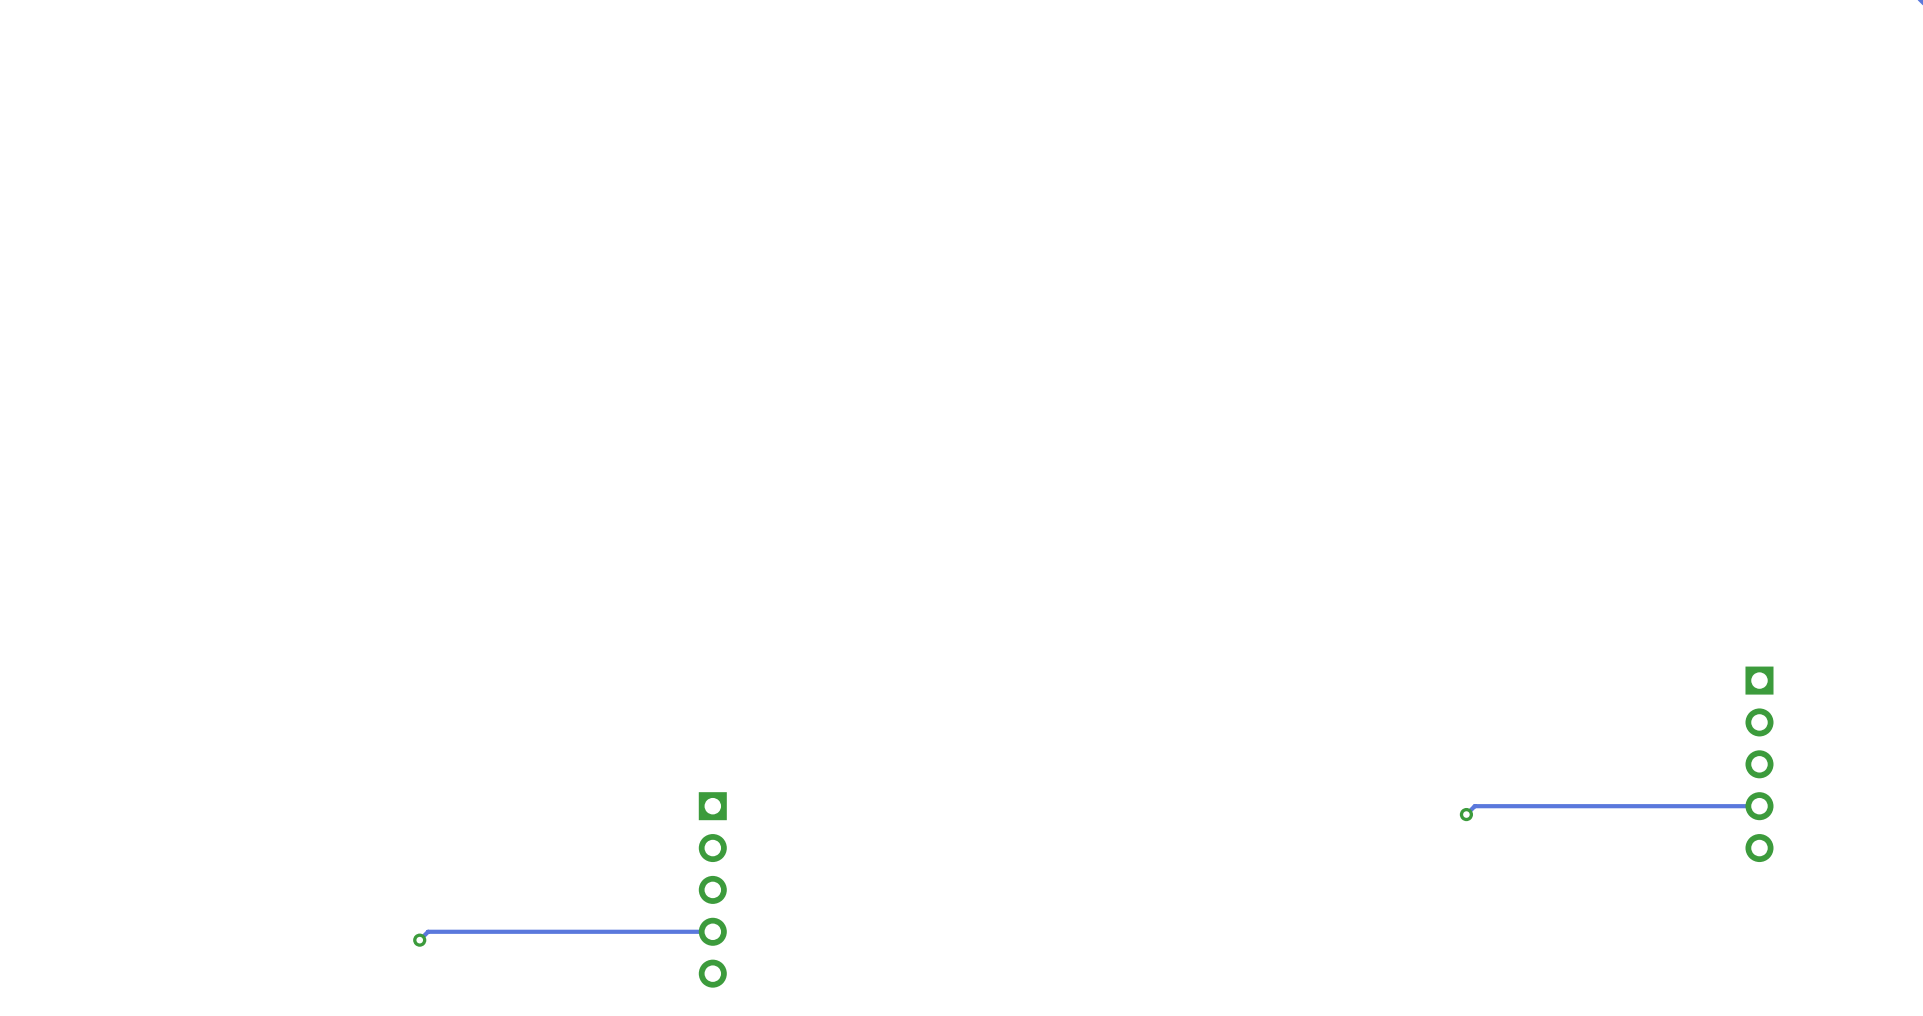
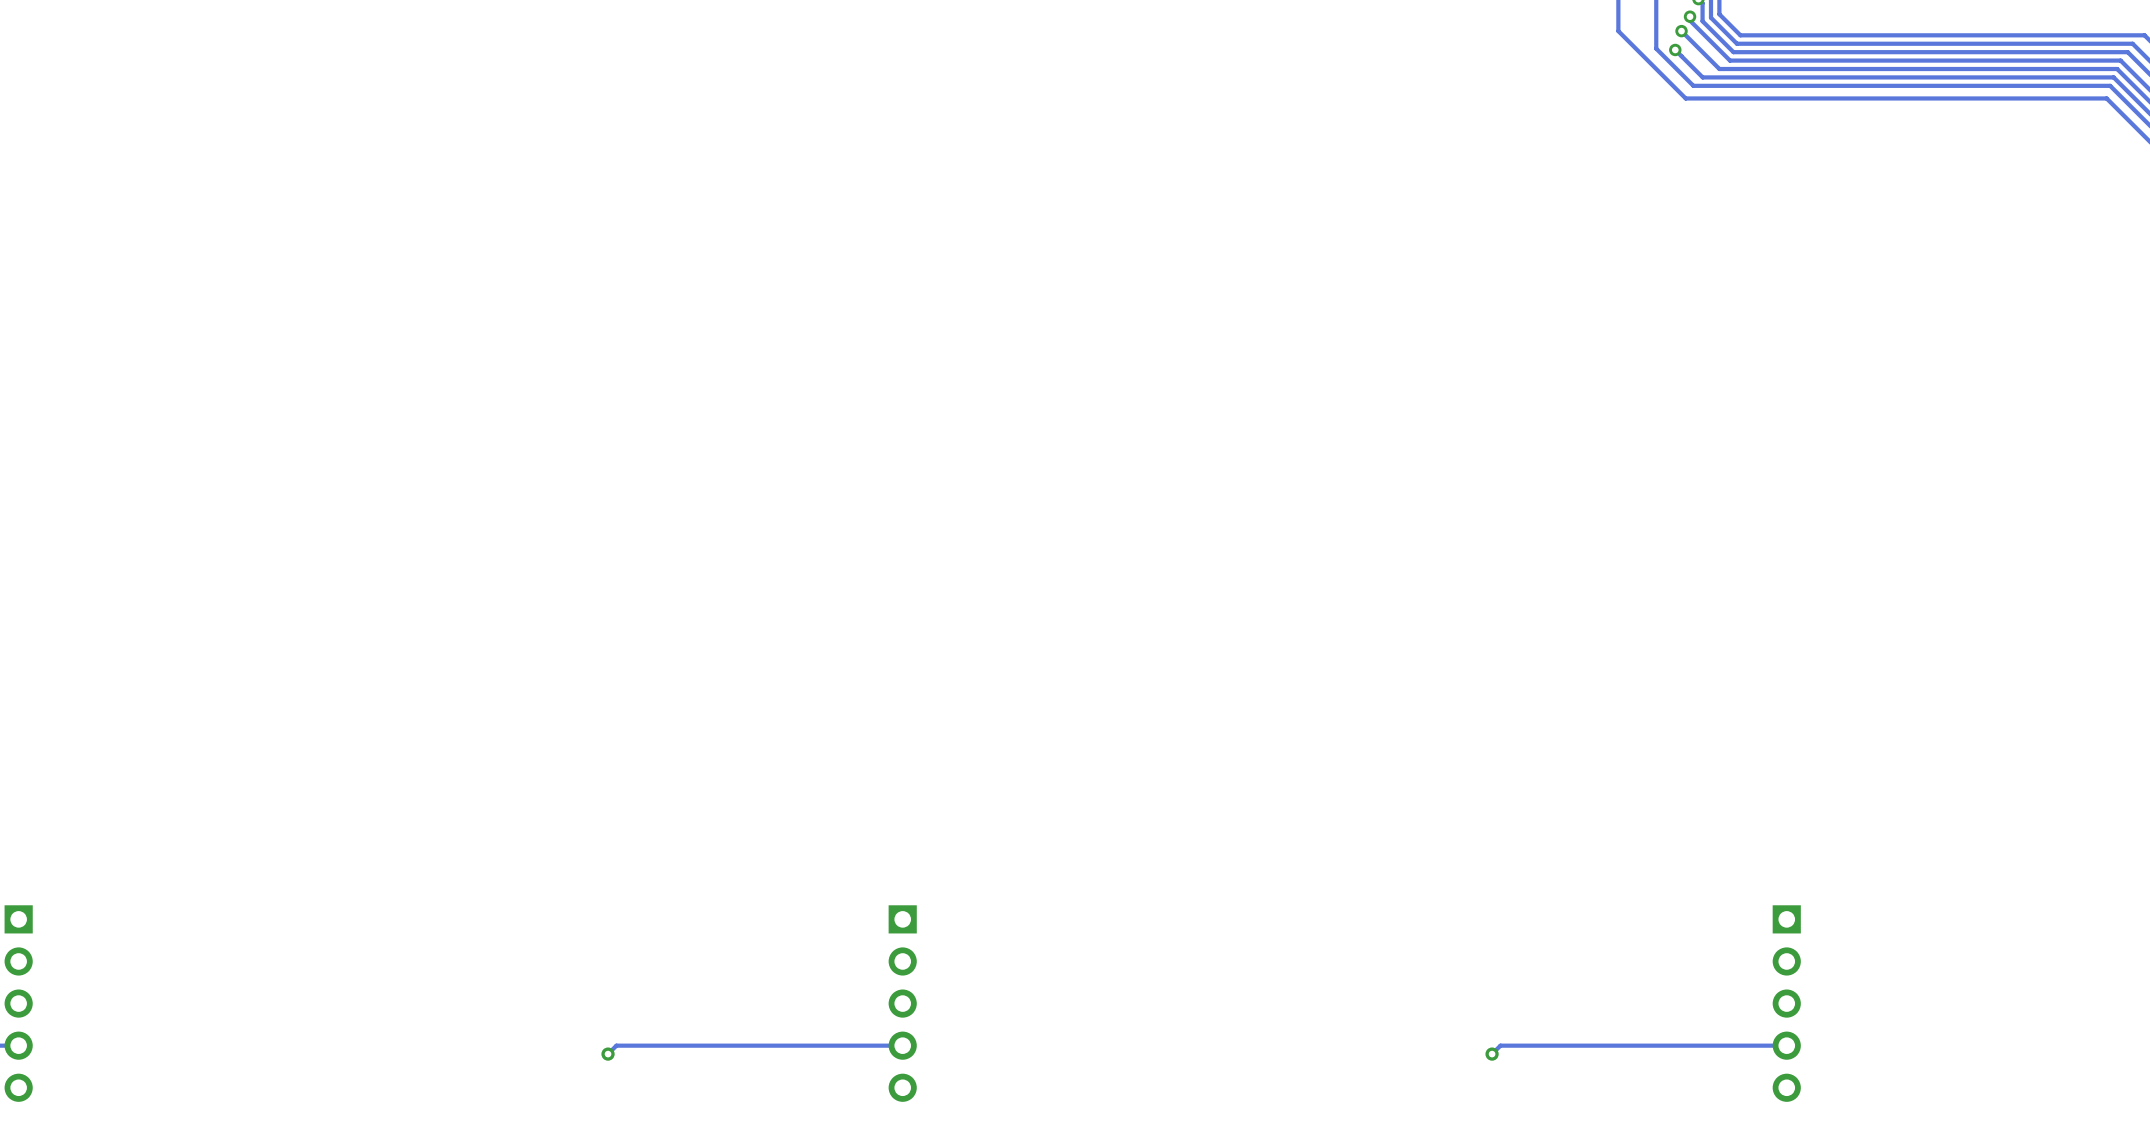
part position: (1759, 764) -> (1786, 1003)
track: (1759, 806) (1474, 806) (1466, 814) -> (1786, 1045) (1500, 1045) (1492, 1054)
via: (1466, 814) -> none
via: none -> (1492, 1054)

